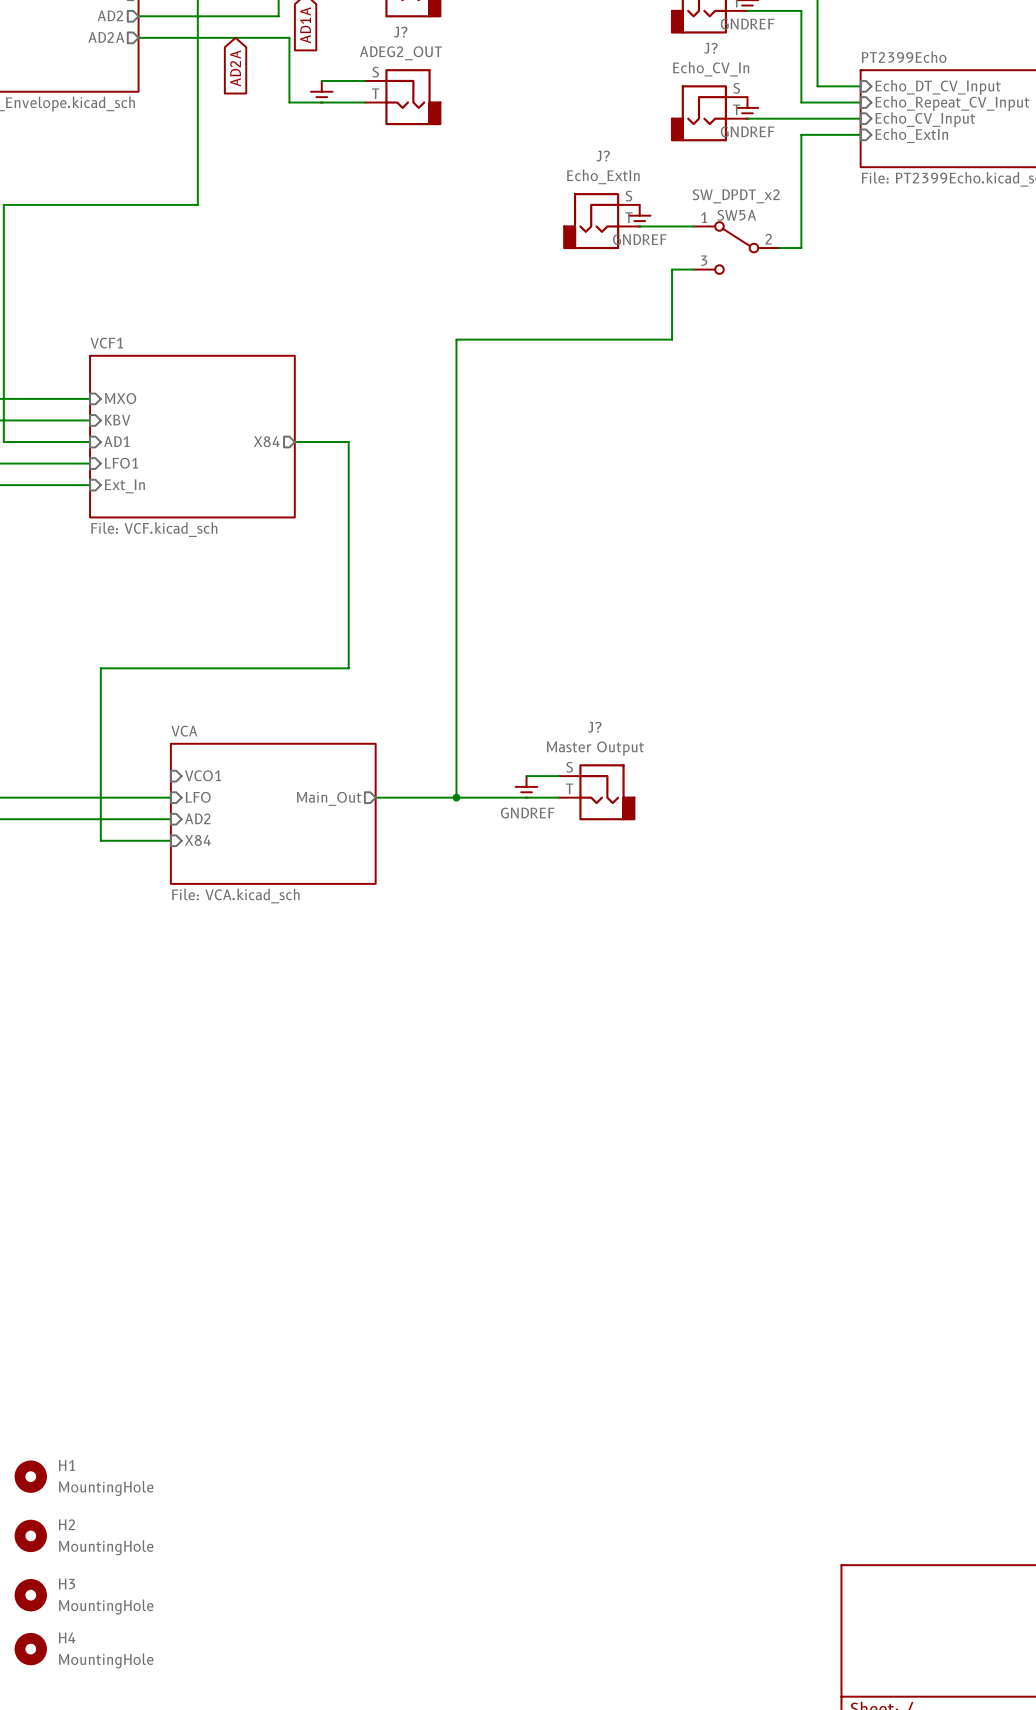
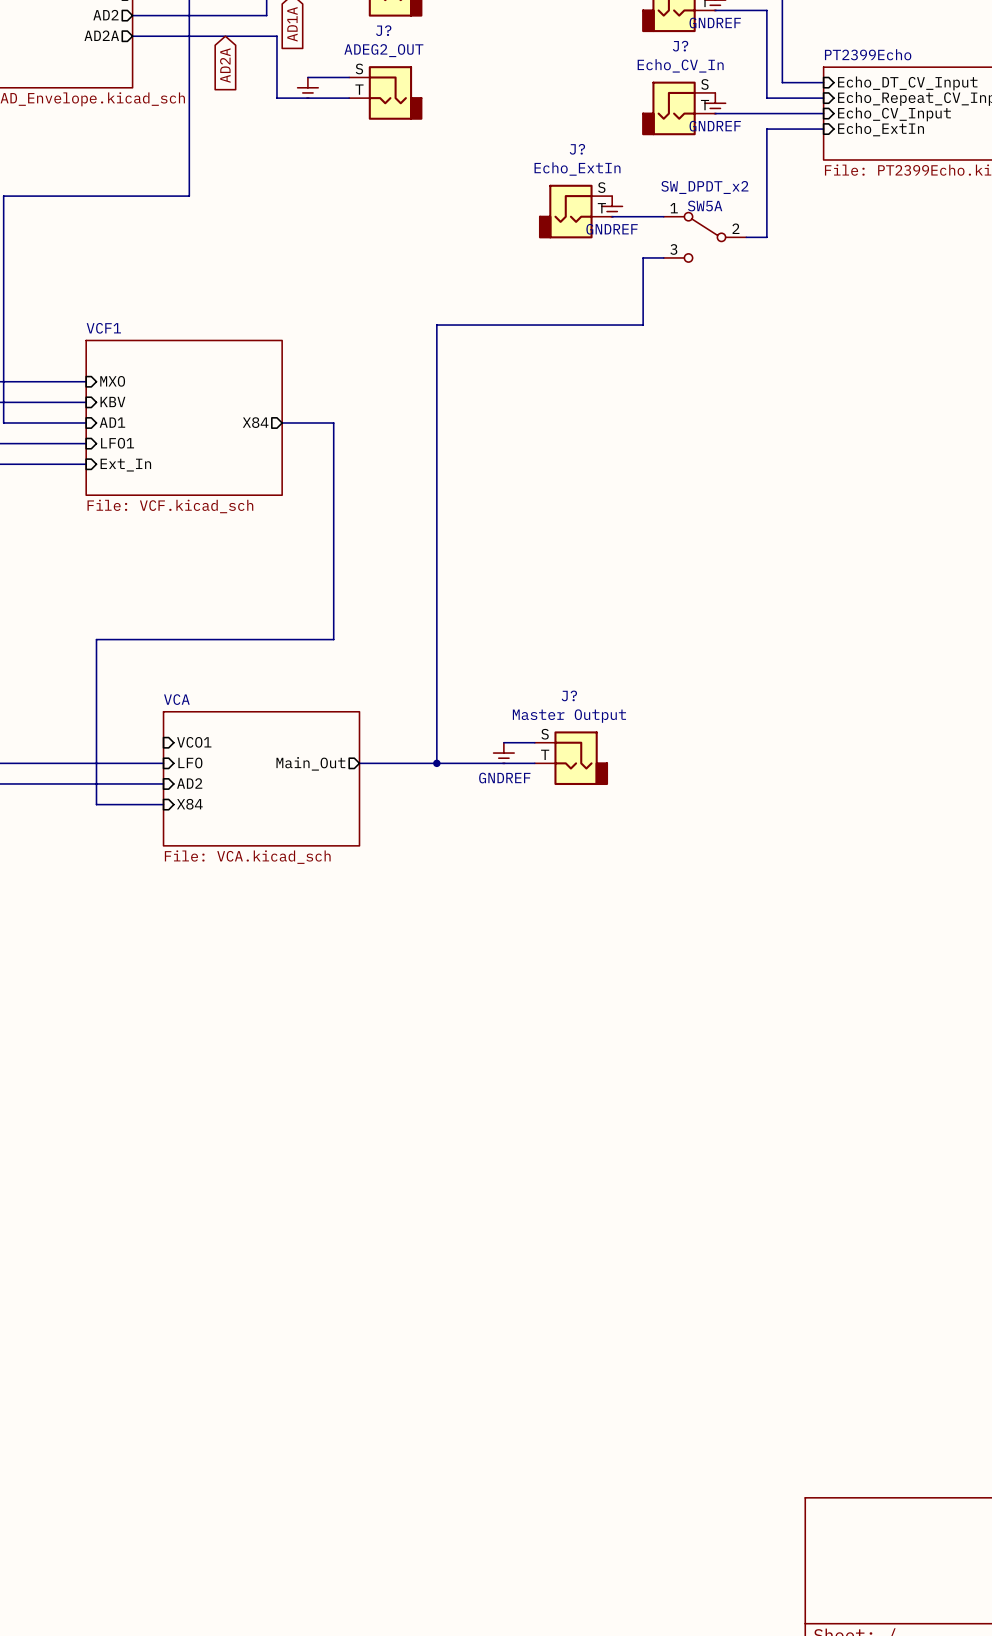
H1: MountingHole (30, 1476) -> none
H2: MountingHole (30, 1535) -> none
H3: MountingHole (30, 1595) -> none
H4: MountingHole (30, 1649) -> none

